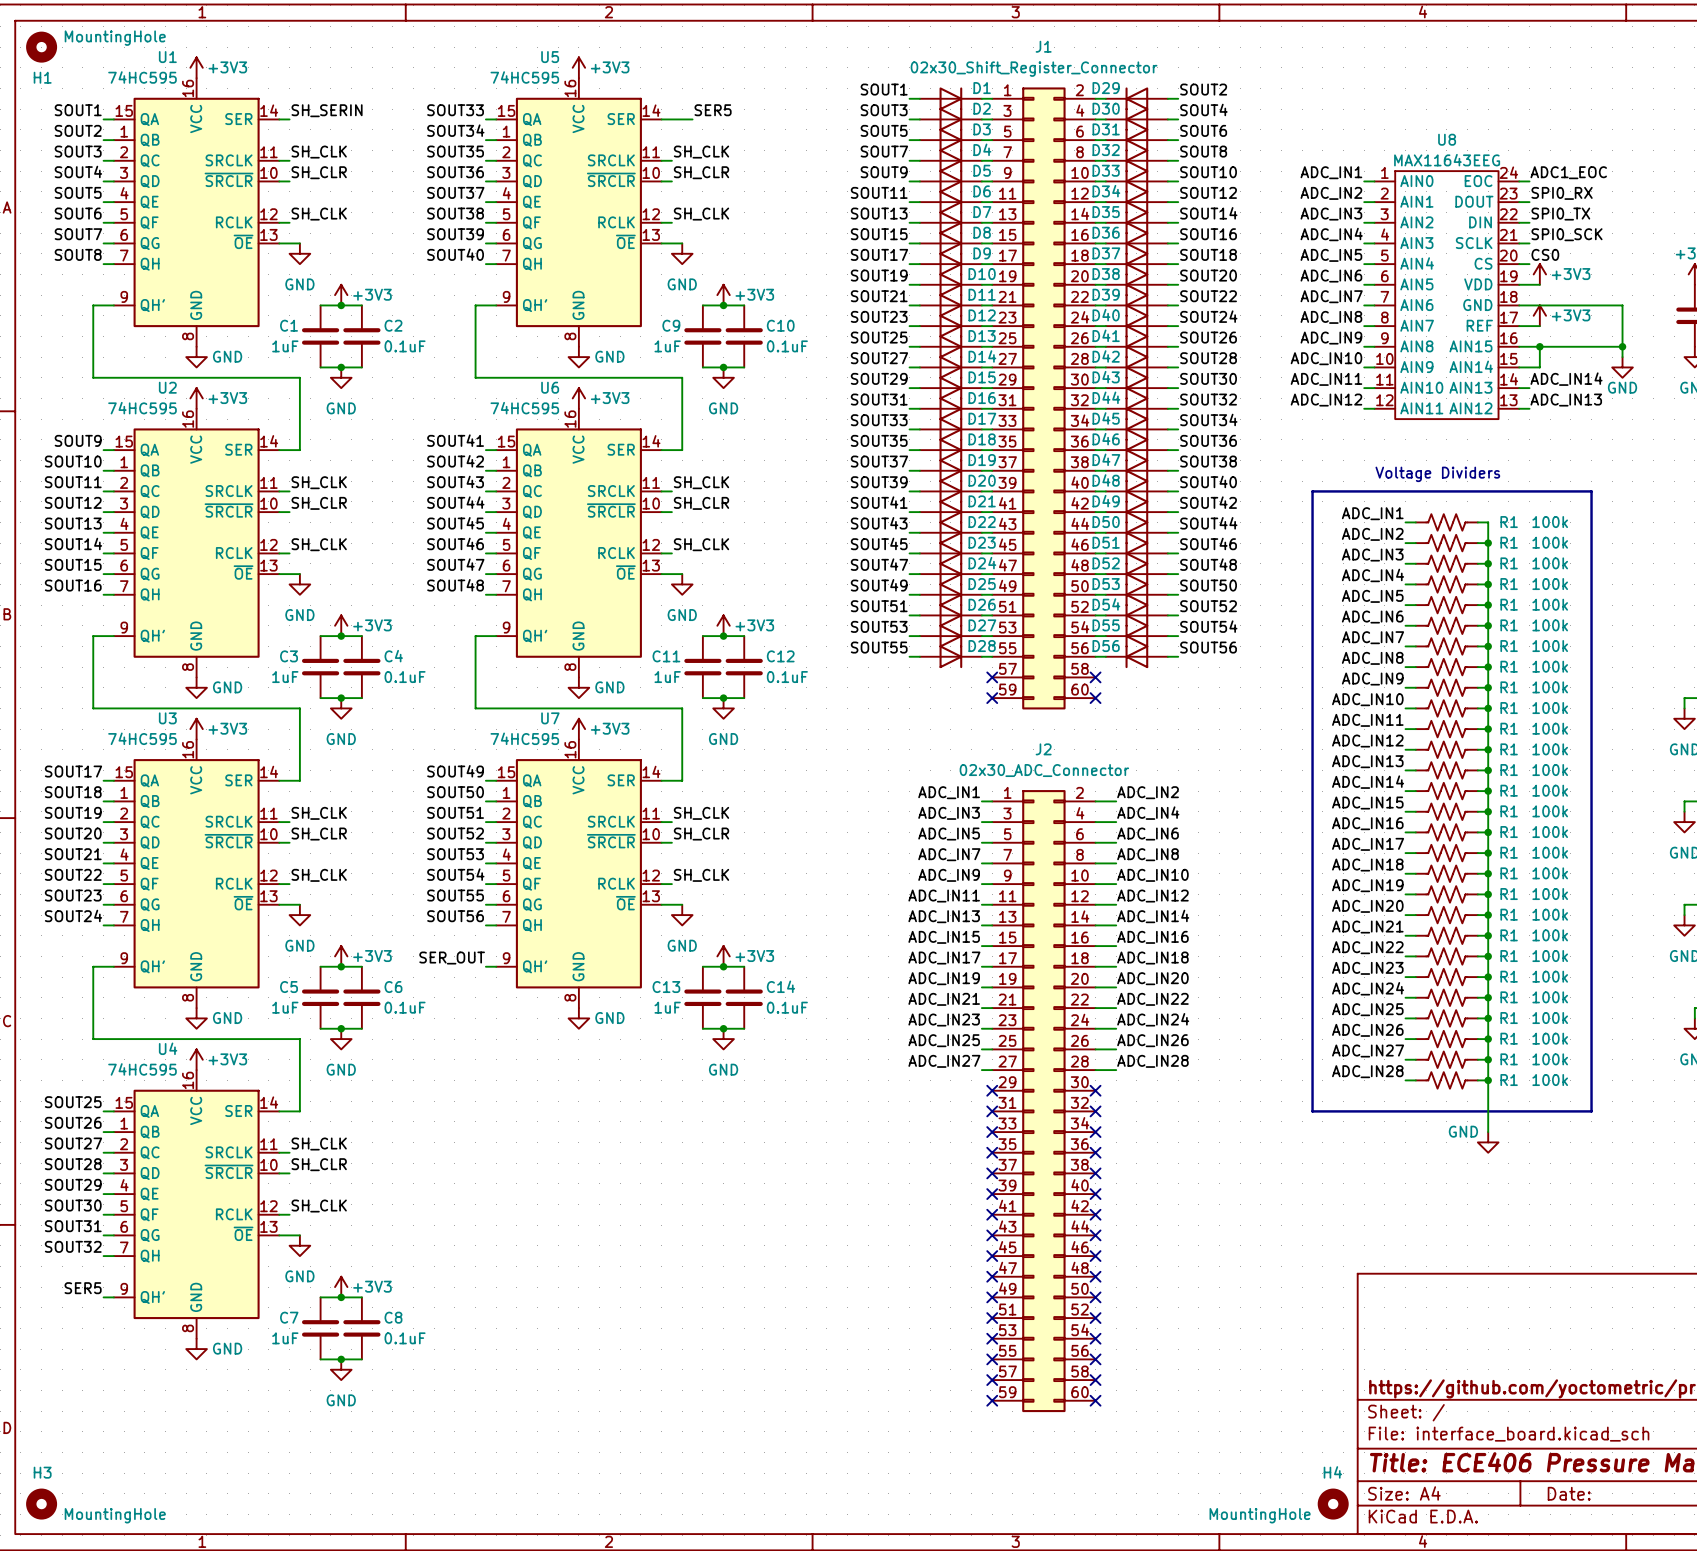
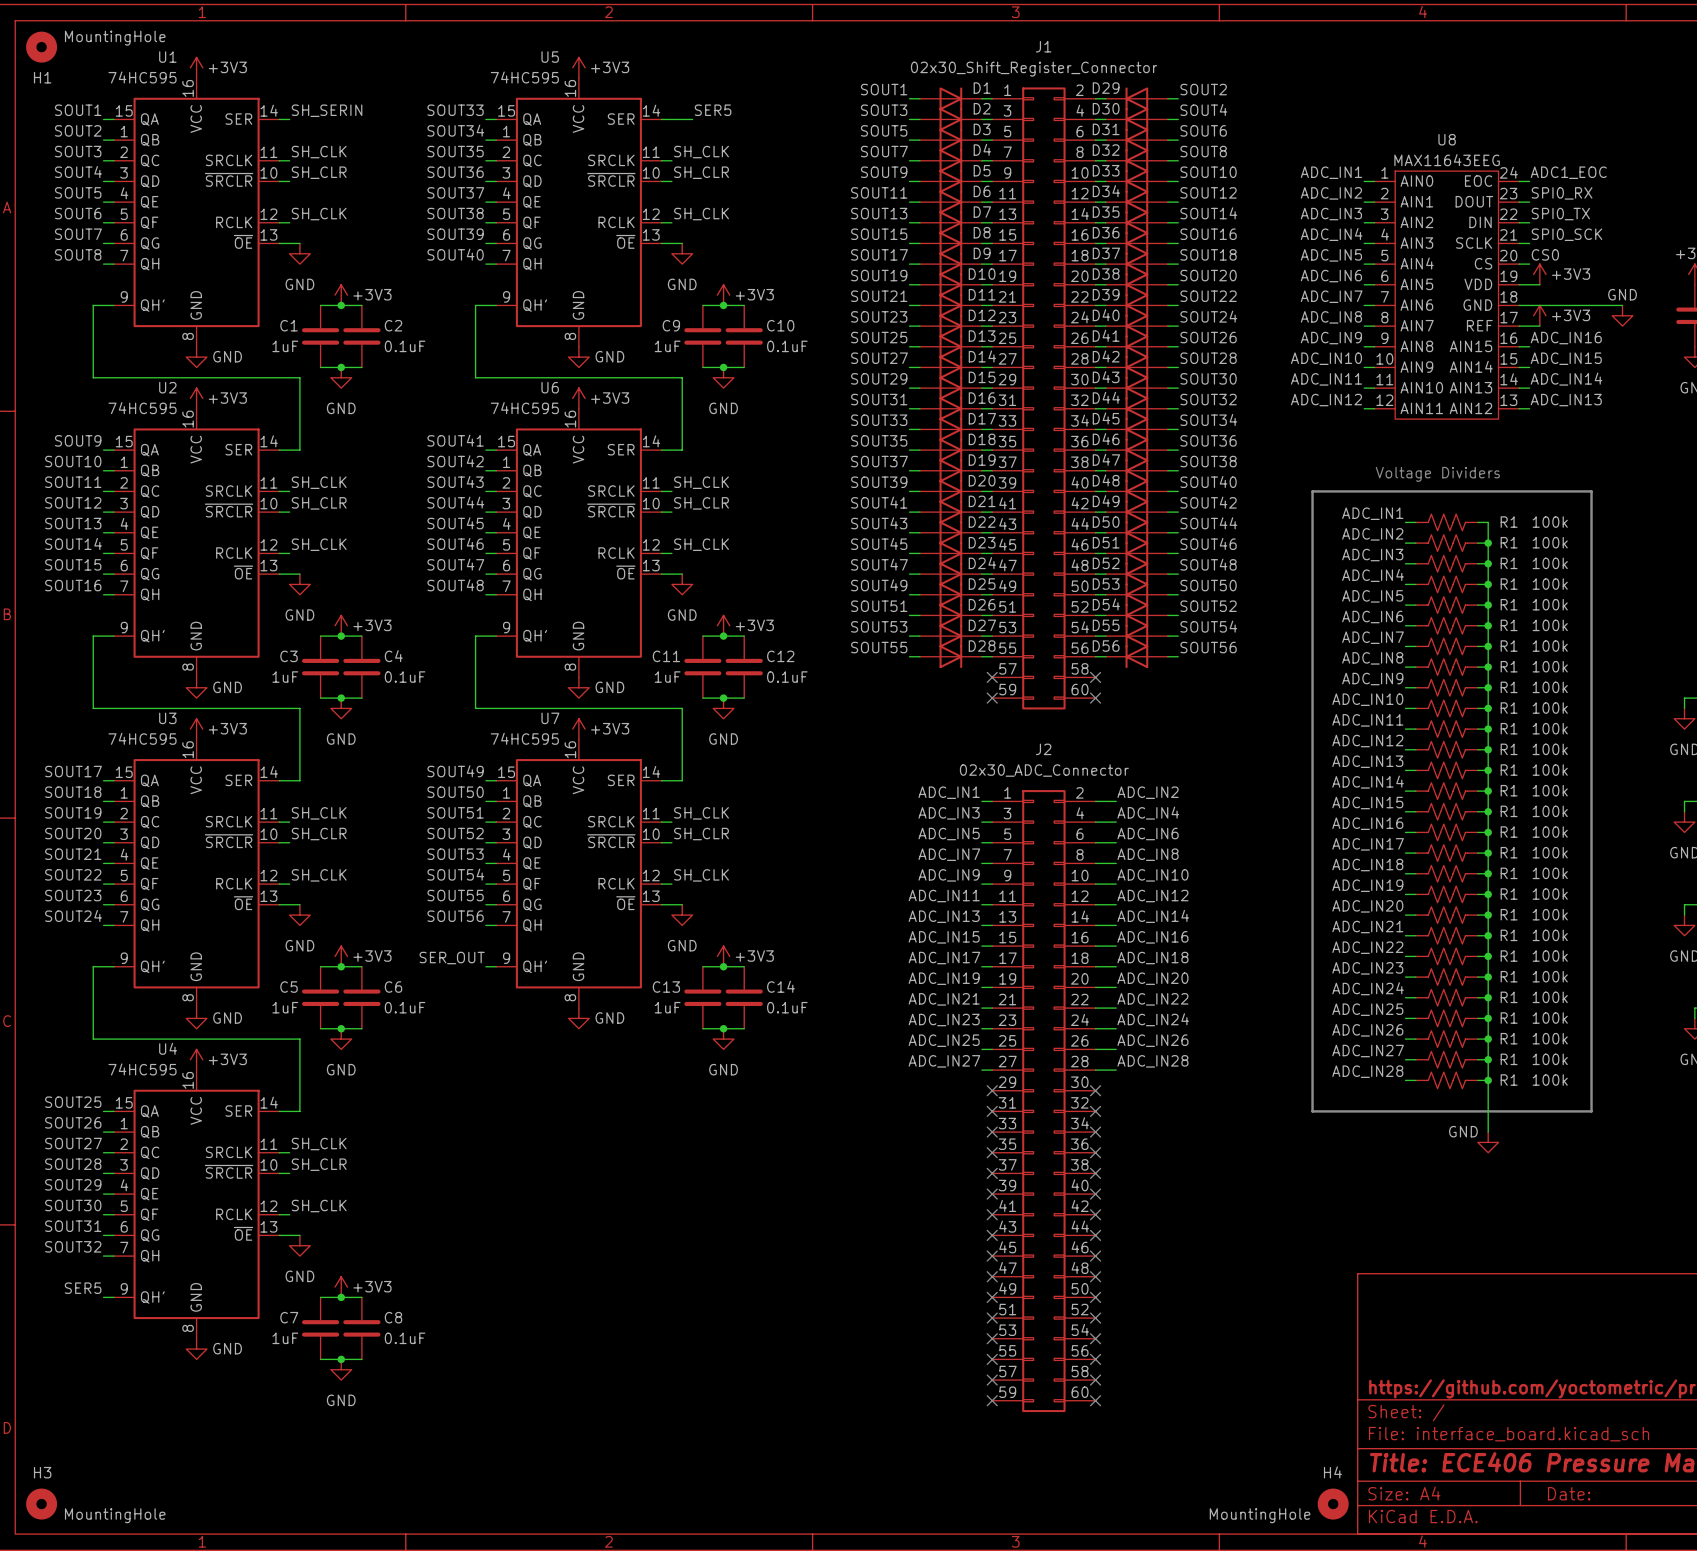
wire: (1622, 305) (1622, 357) -> none
label: none -> ADC_IN16 (1566, 338)
wire: (1529, 346) (1622, 346) -> none
wire: (1539, 346) (1539, 367) (1529, 367) -> none
junction: (1539, 346) -> none
junction: (1622, 346) -> none
label: none -> ADC_IN15 (1566, 358)
power symbol position: GND (1622, 367) -> GND (1622, 315)
power symbol text position: GND (1622, 387) -> GND (1622, 294)

